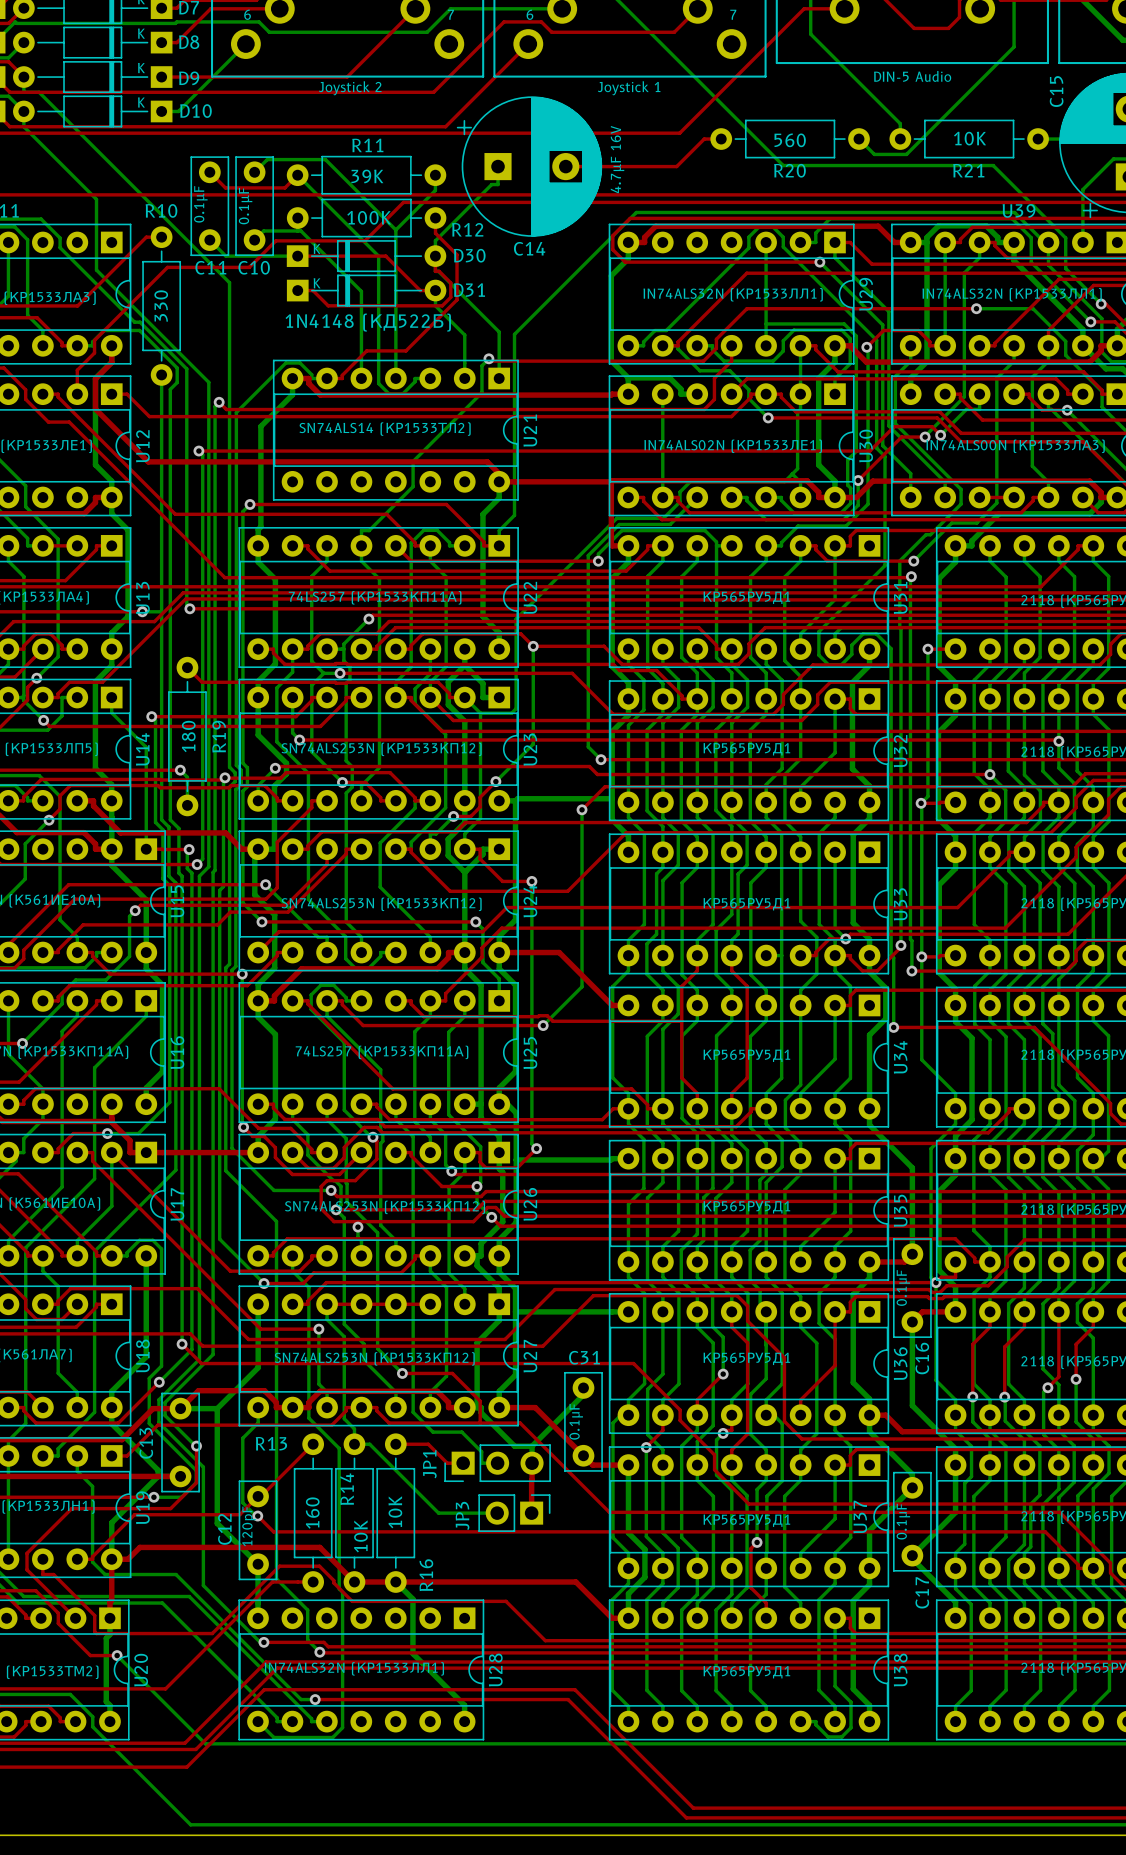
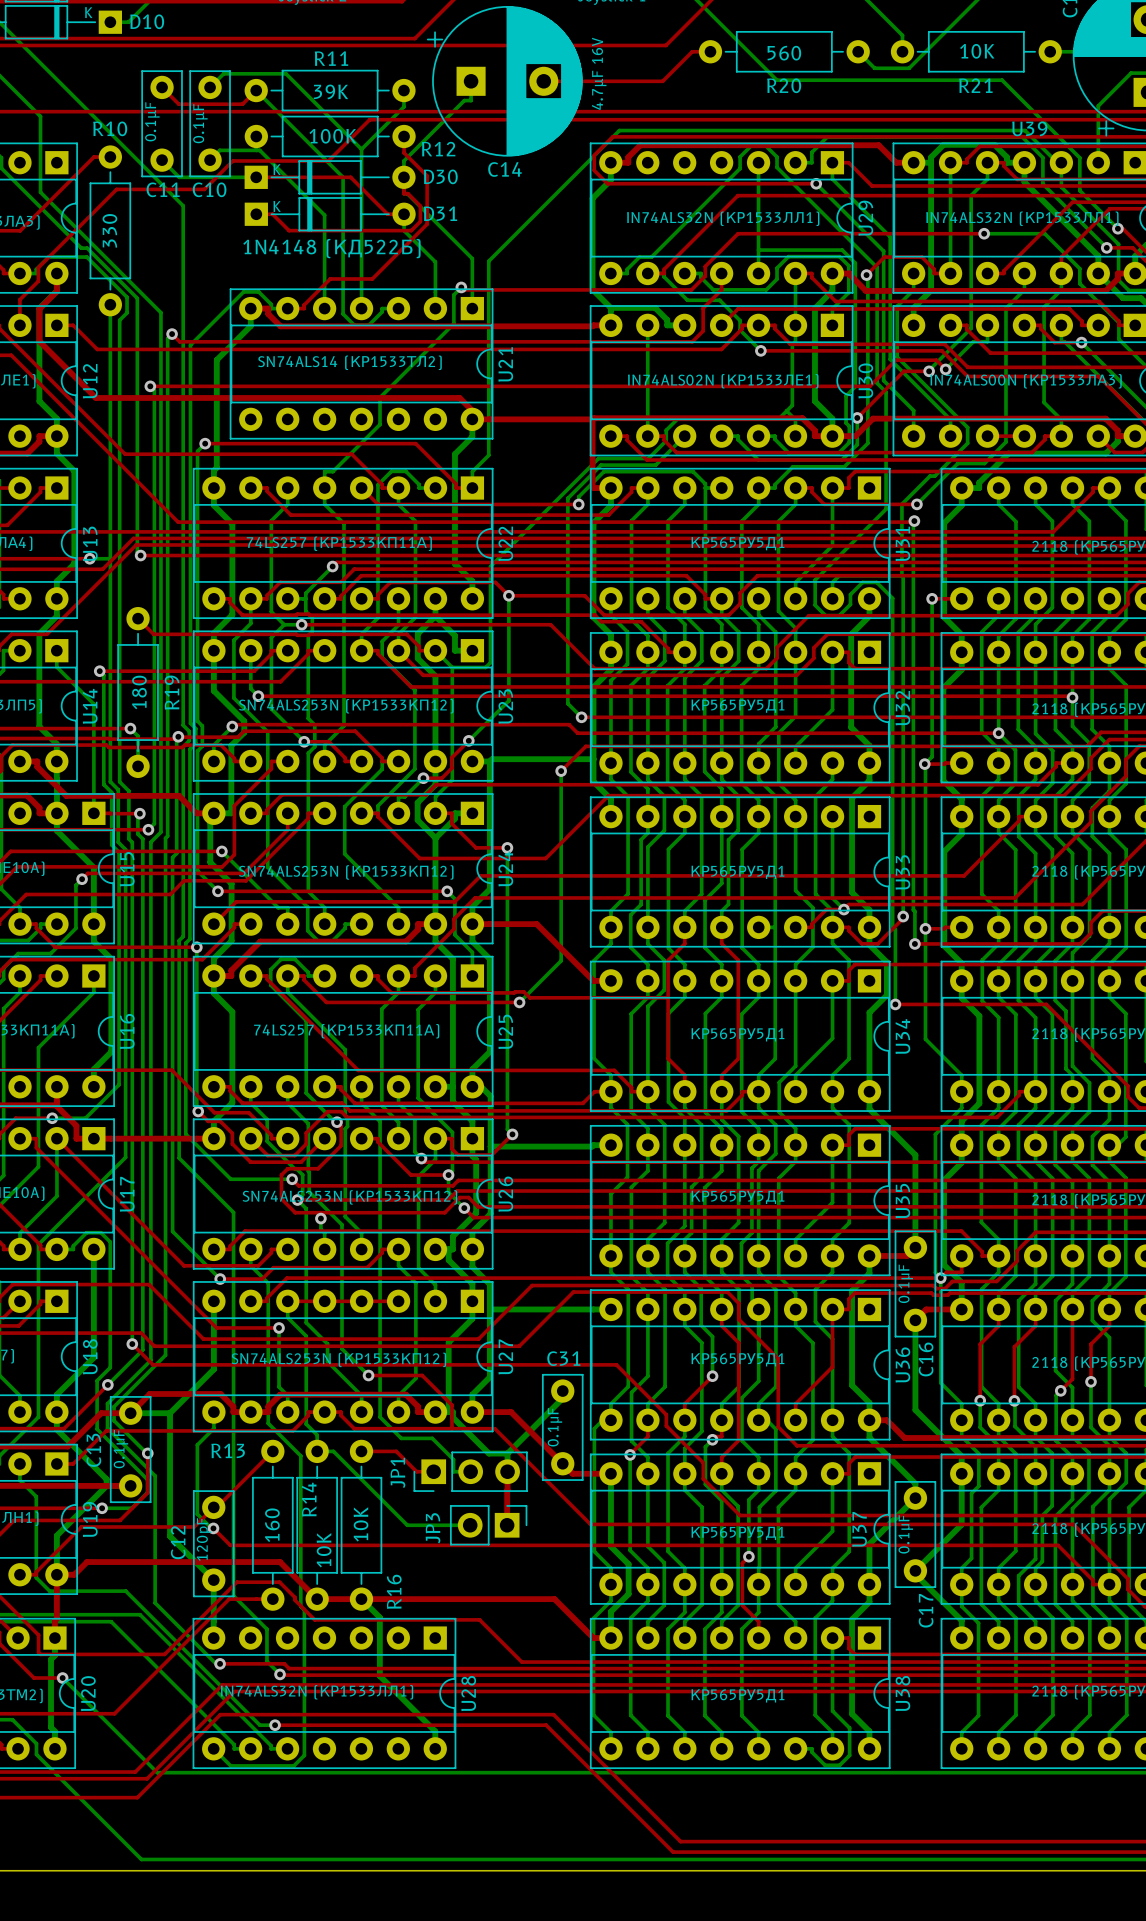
C13 value: none -> 0.1μF (120, 1449)

